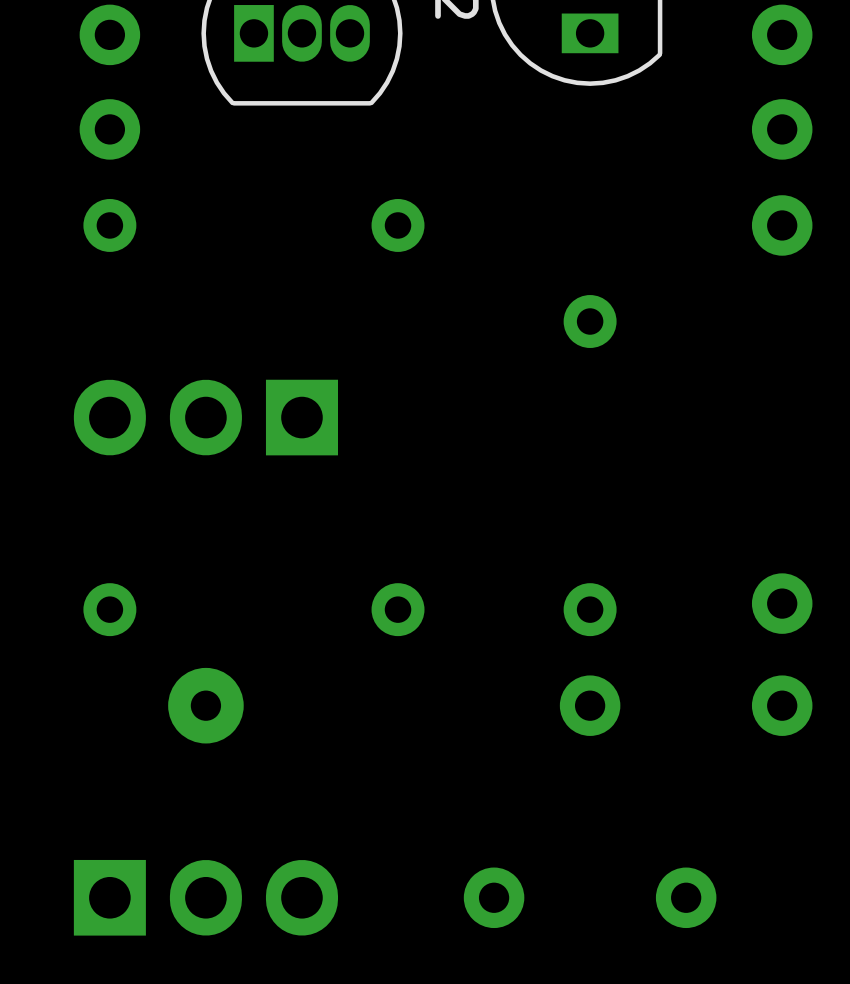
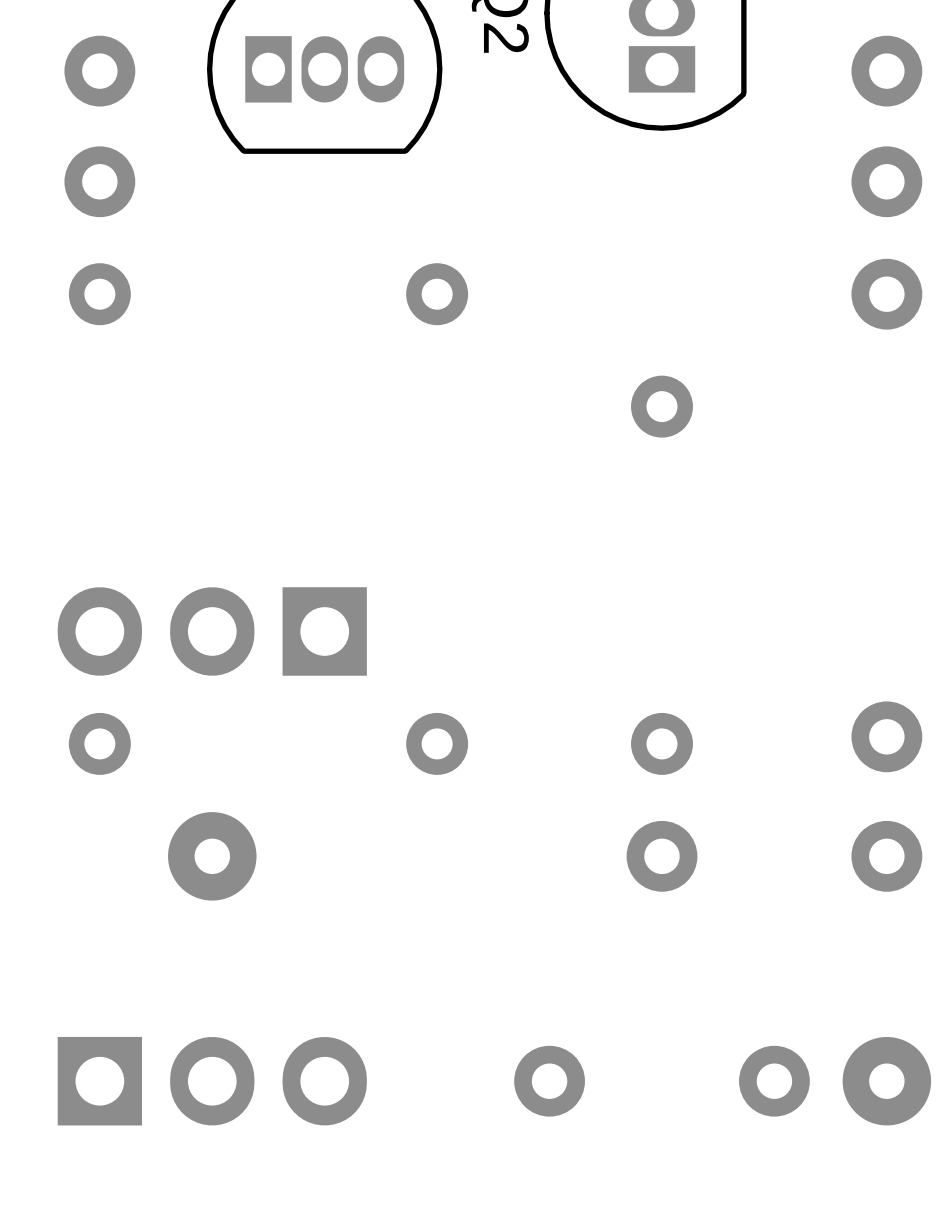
part position: (205, 417) -> (212, 631)
part: none -> (886, 1081)

